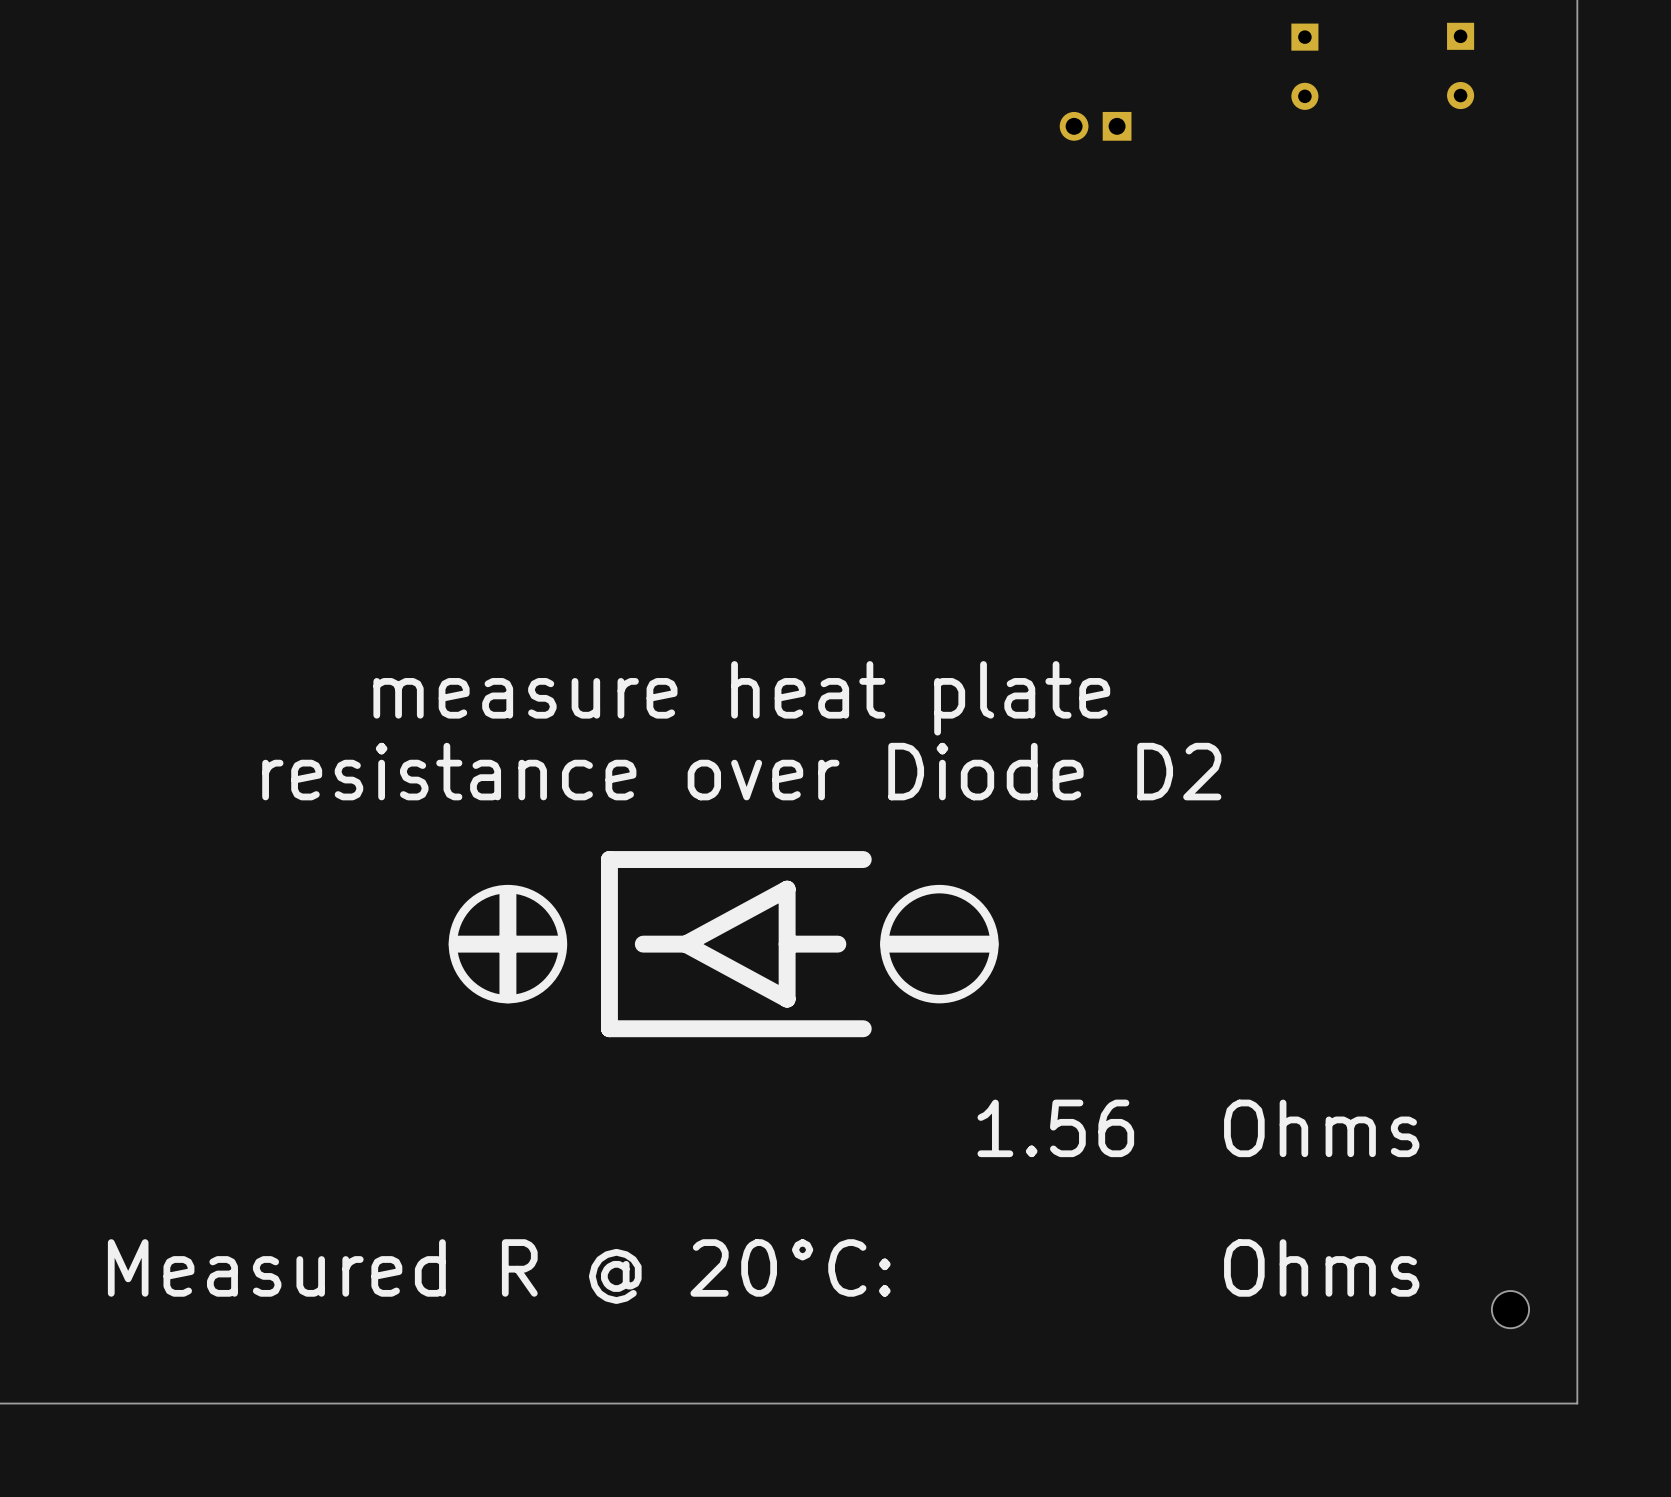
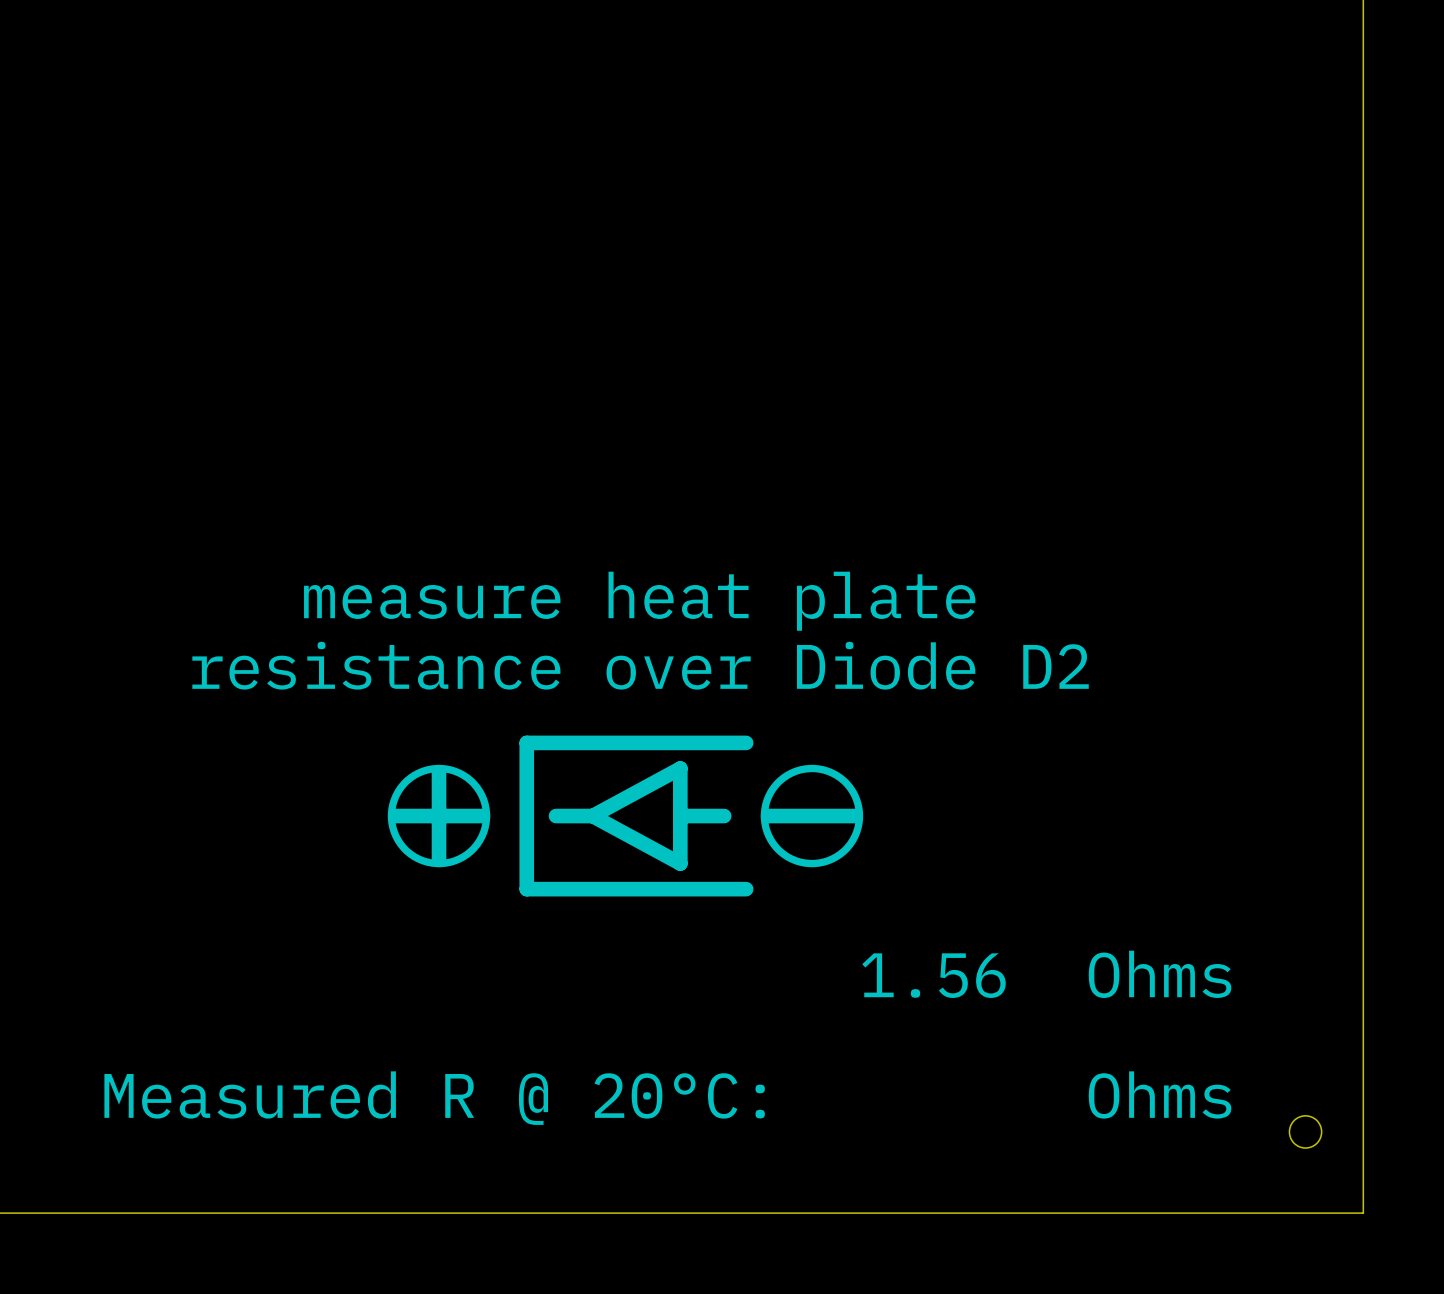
part: (1460, 65) -> none
part: (1304, 66) -> none
part: (1095, 126) -> none

